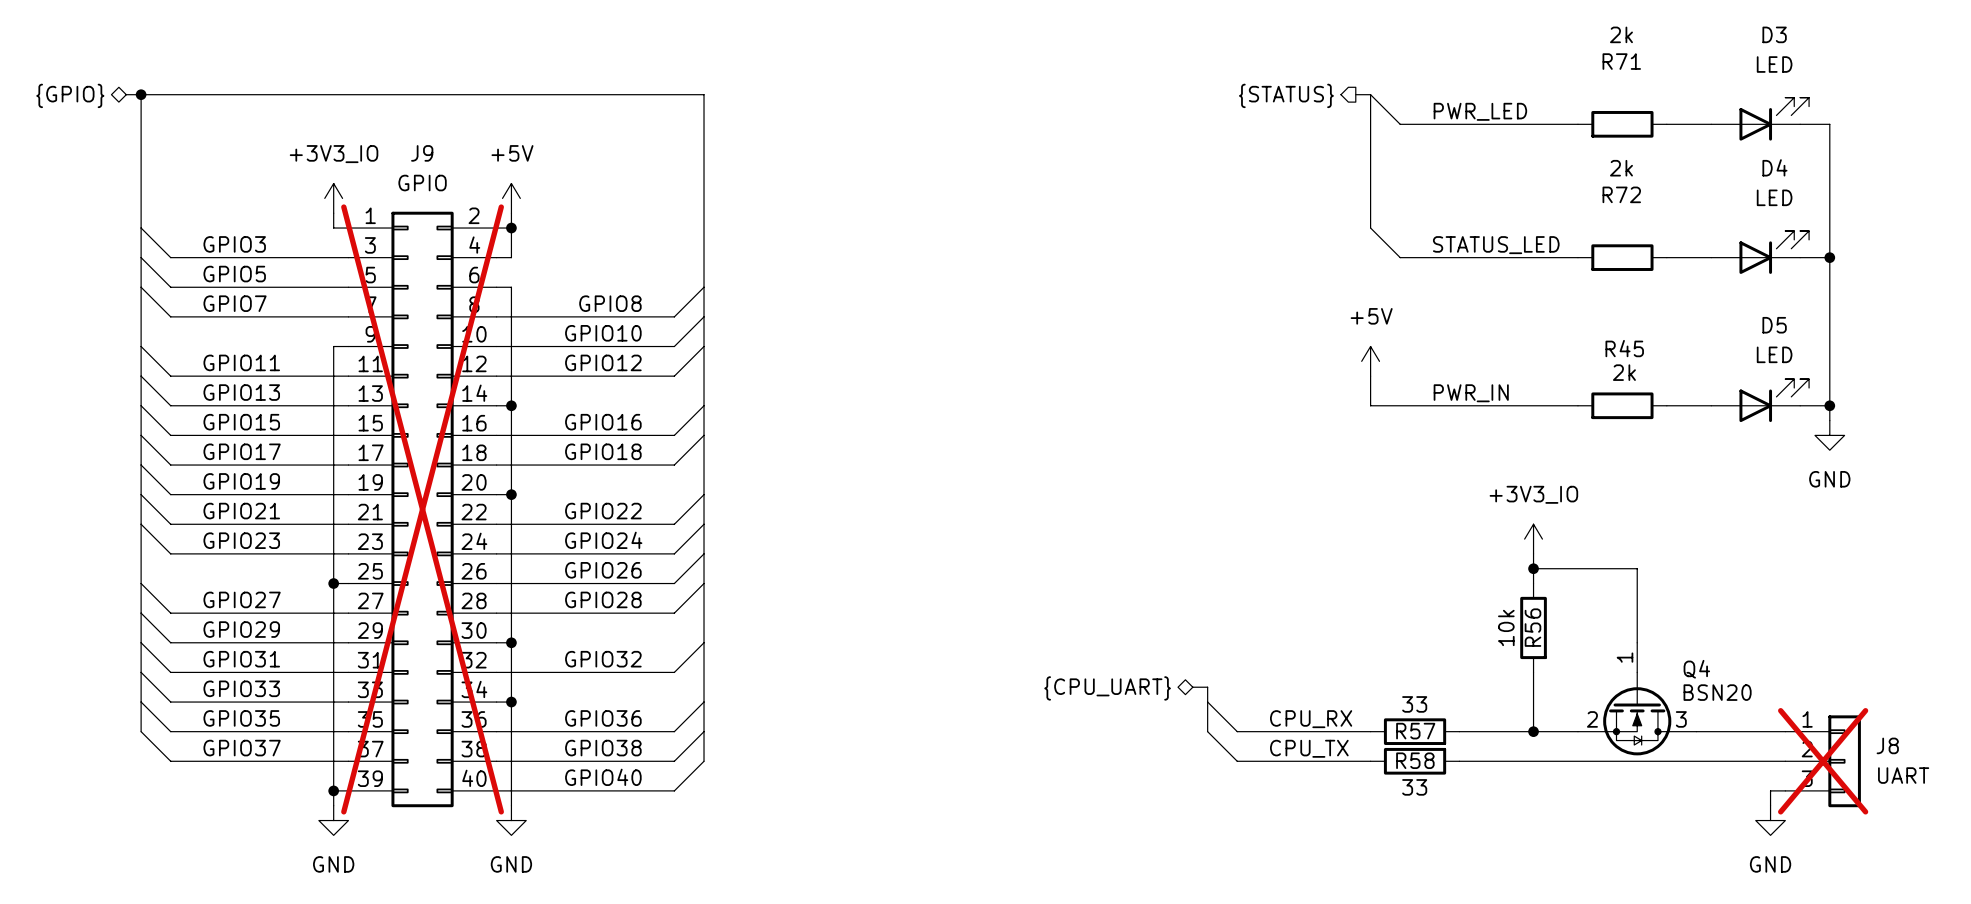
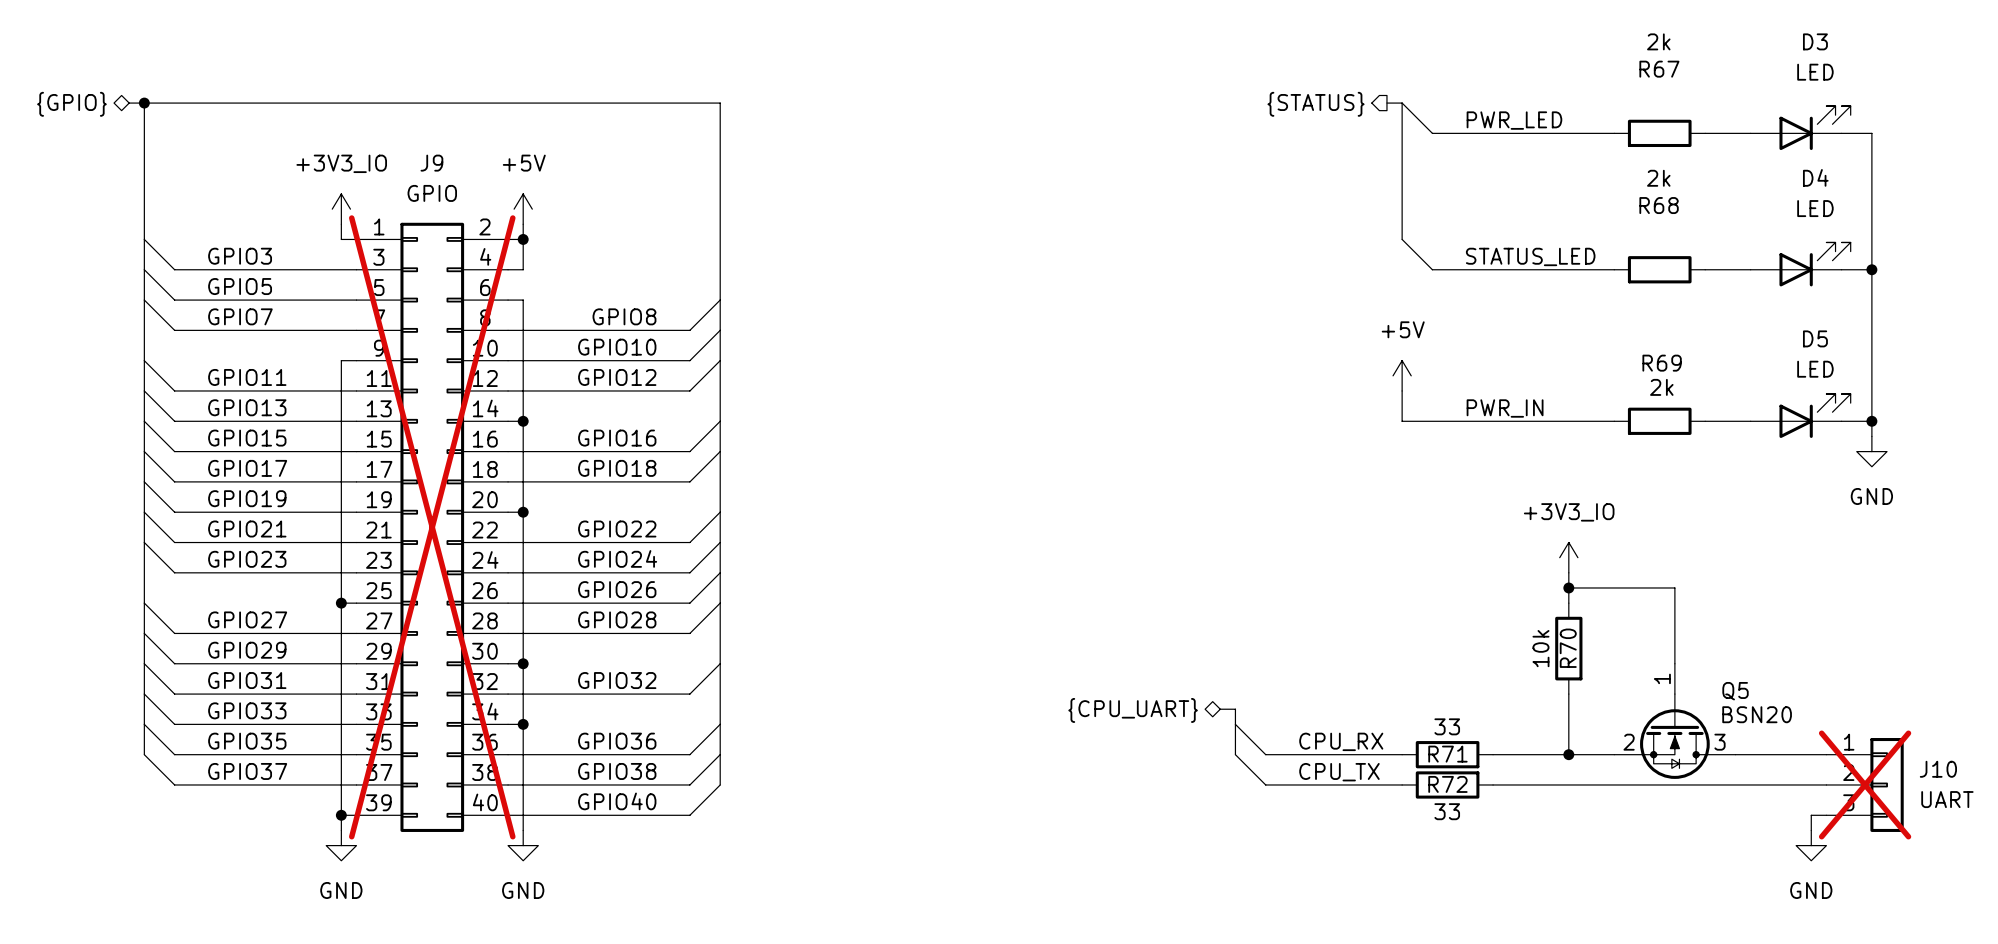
R71 name: R71 (1621, 61) -> R67 (1659, 69)
R72 name: R72 (1621, 194) -> R68 (1659, 205)
R45 name: R45 (1624, 348) -> R69 (1662, 363)
R56 name: R56 (1532, 627) -> R70 (1568, 648)
Q4 name: Q4 (1696, 669) -> Q5 (1735, 691)
R57 name: R57 (1415, 731) -> R71 (1447, 754)
J8 name: J8 (1887, 745) -> J10 (1938, 769)
R58 name: R58 (1415, 760) -> R72 (1447, 784)

